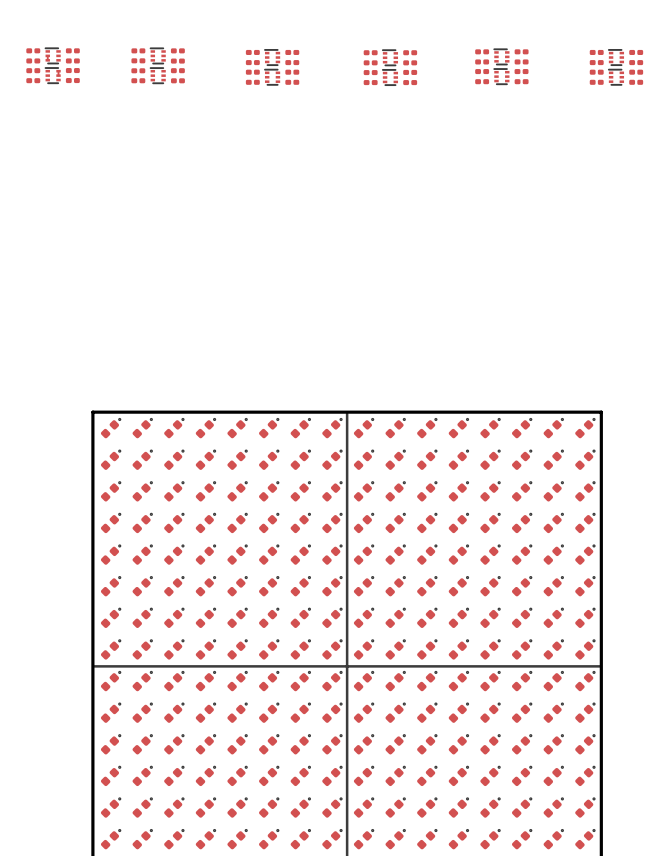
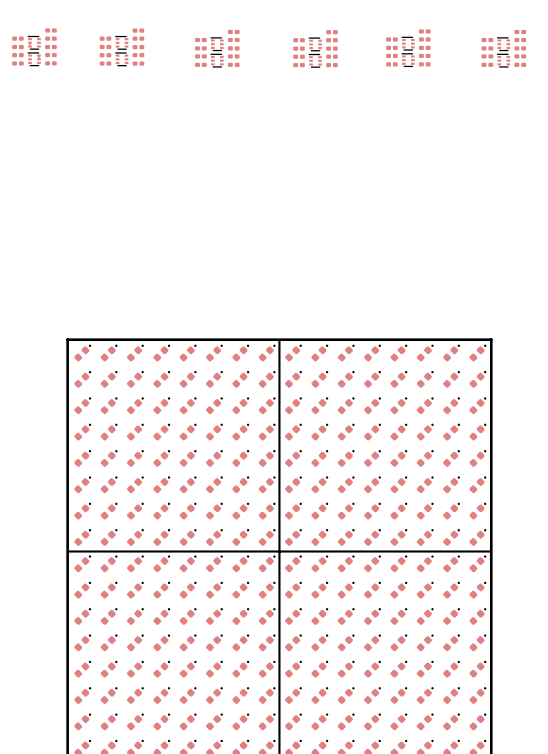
part: none -> (50, 30)
part: none -> (138, 30)
part: none -> (233, 31)
part: none -> (424, 31)
part: none -> (520, 31)
part: none -> (331, 32)

